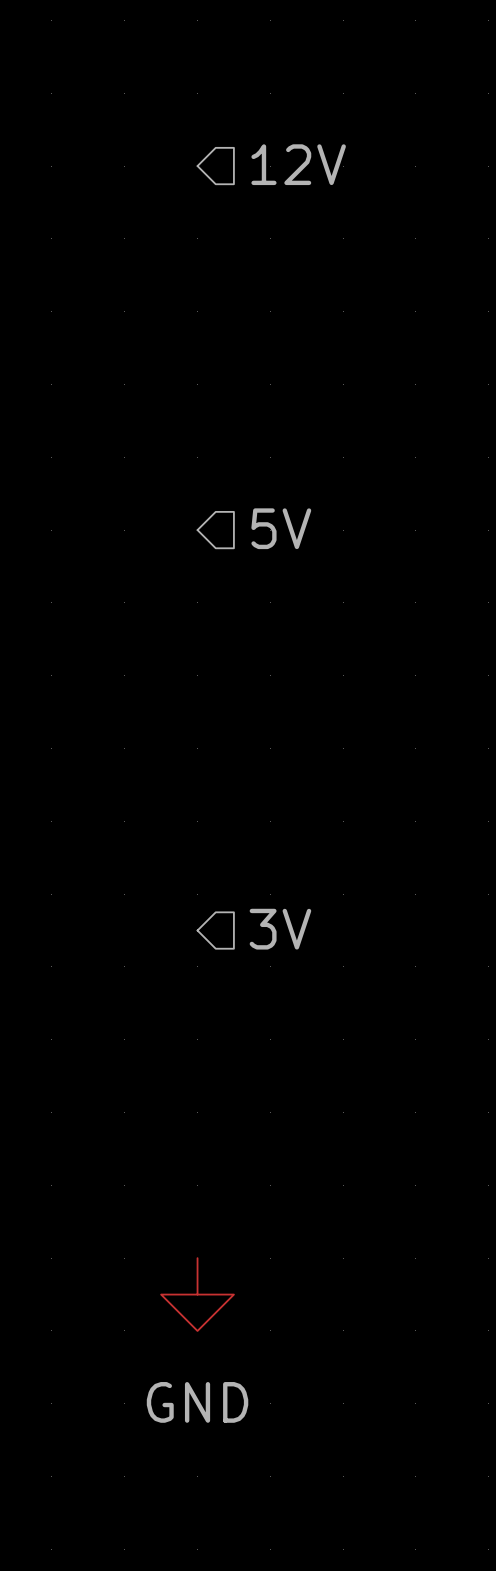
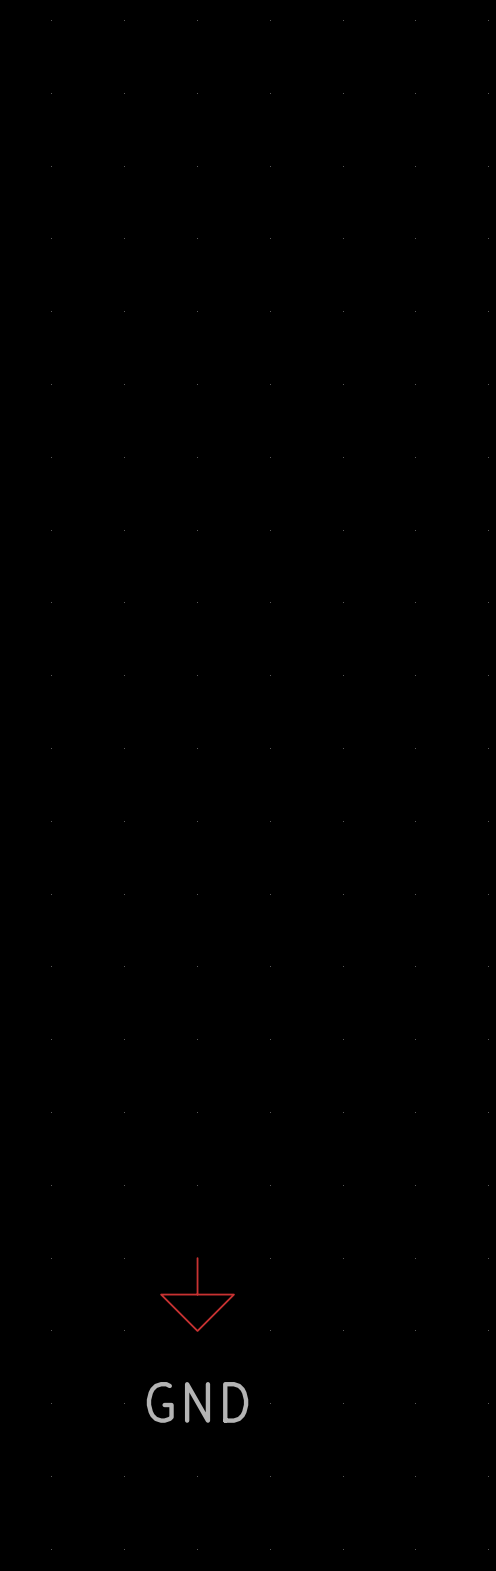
hierarchical label: 12V (298, 164) -> none
hierarchical label: 5V (281, 528) -> none
hierarchical label: 3V (280, 929) -> none

